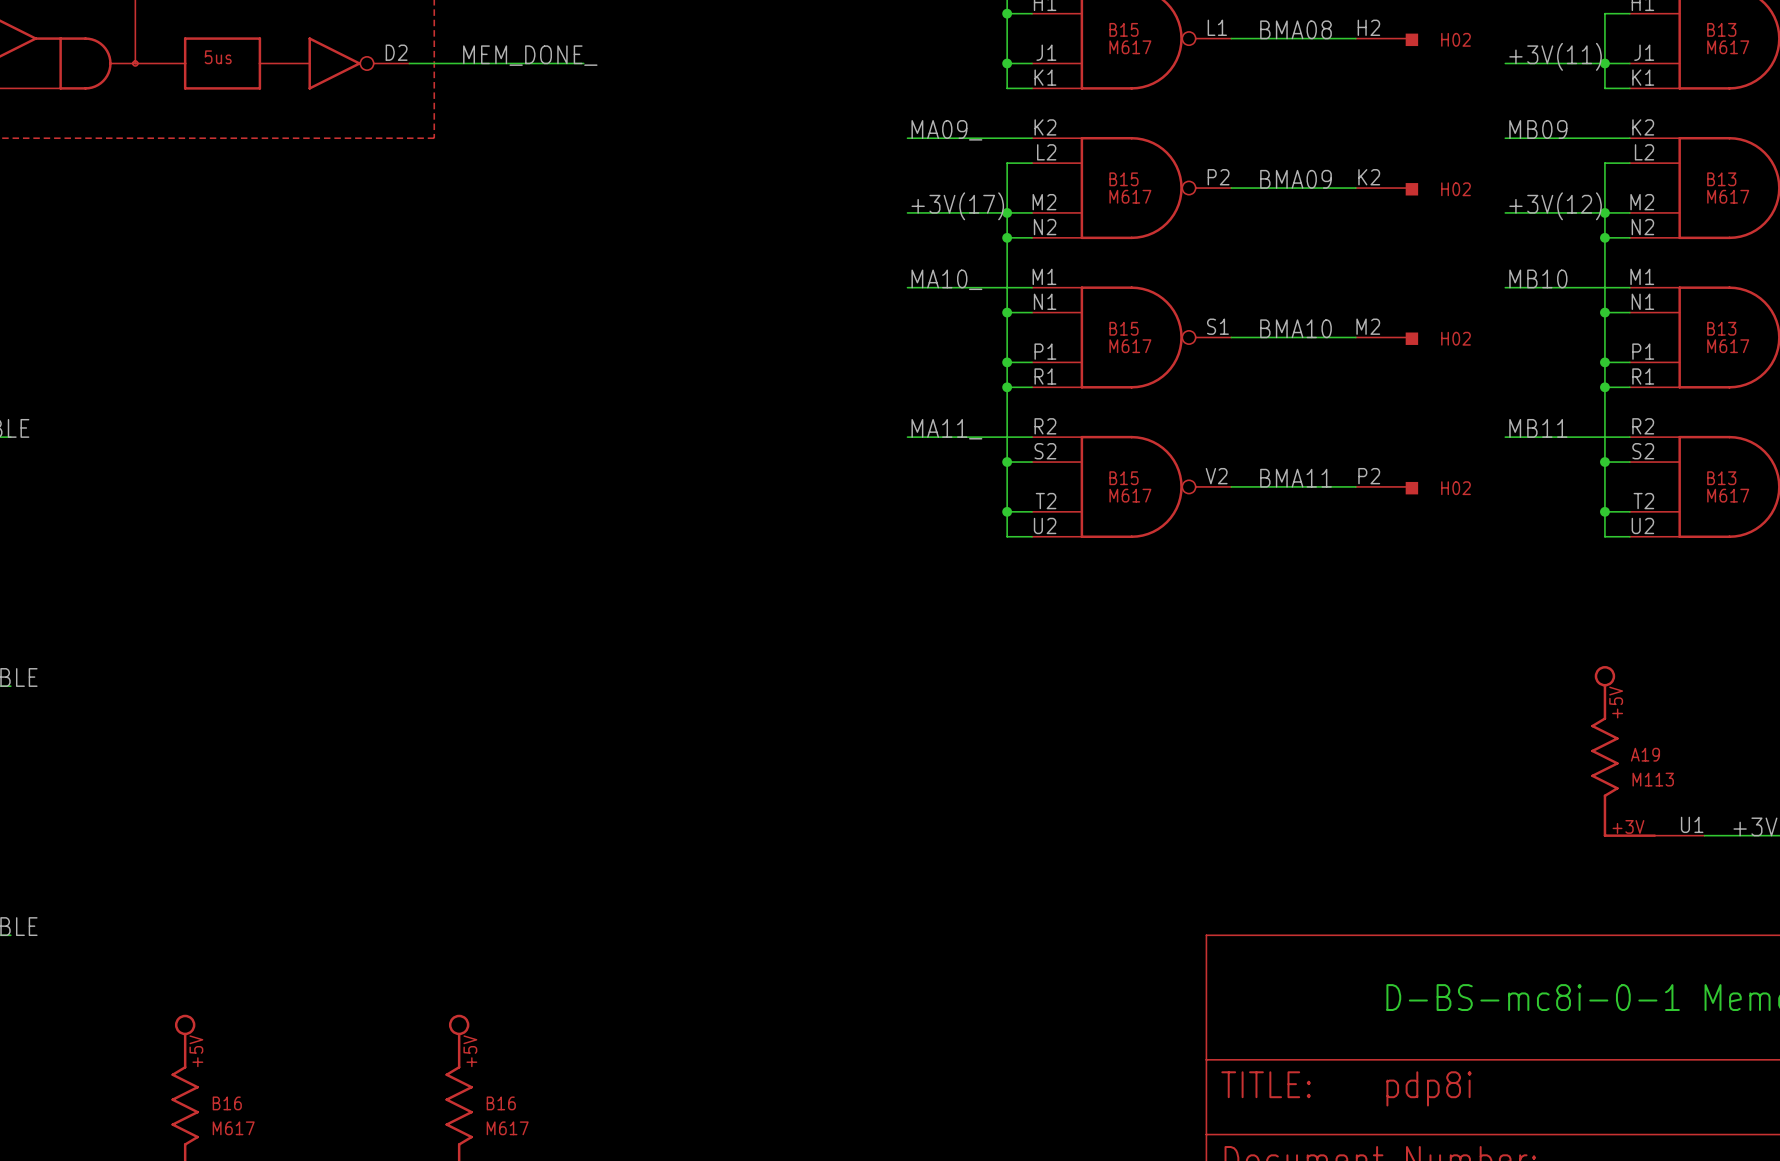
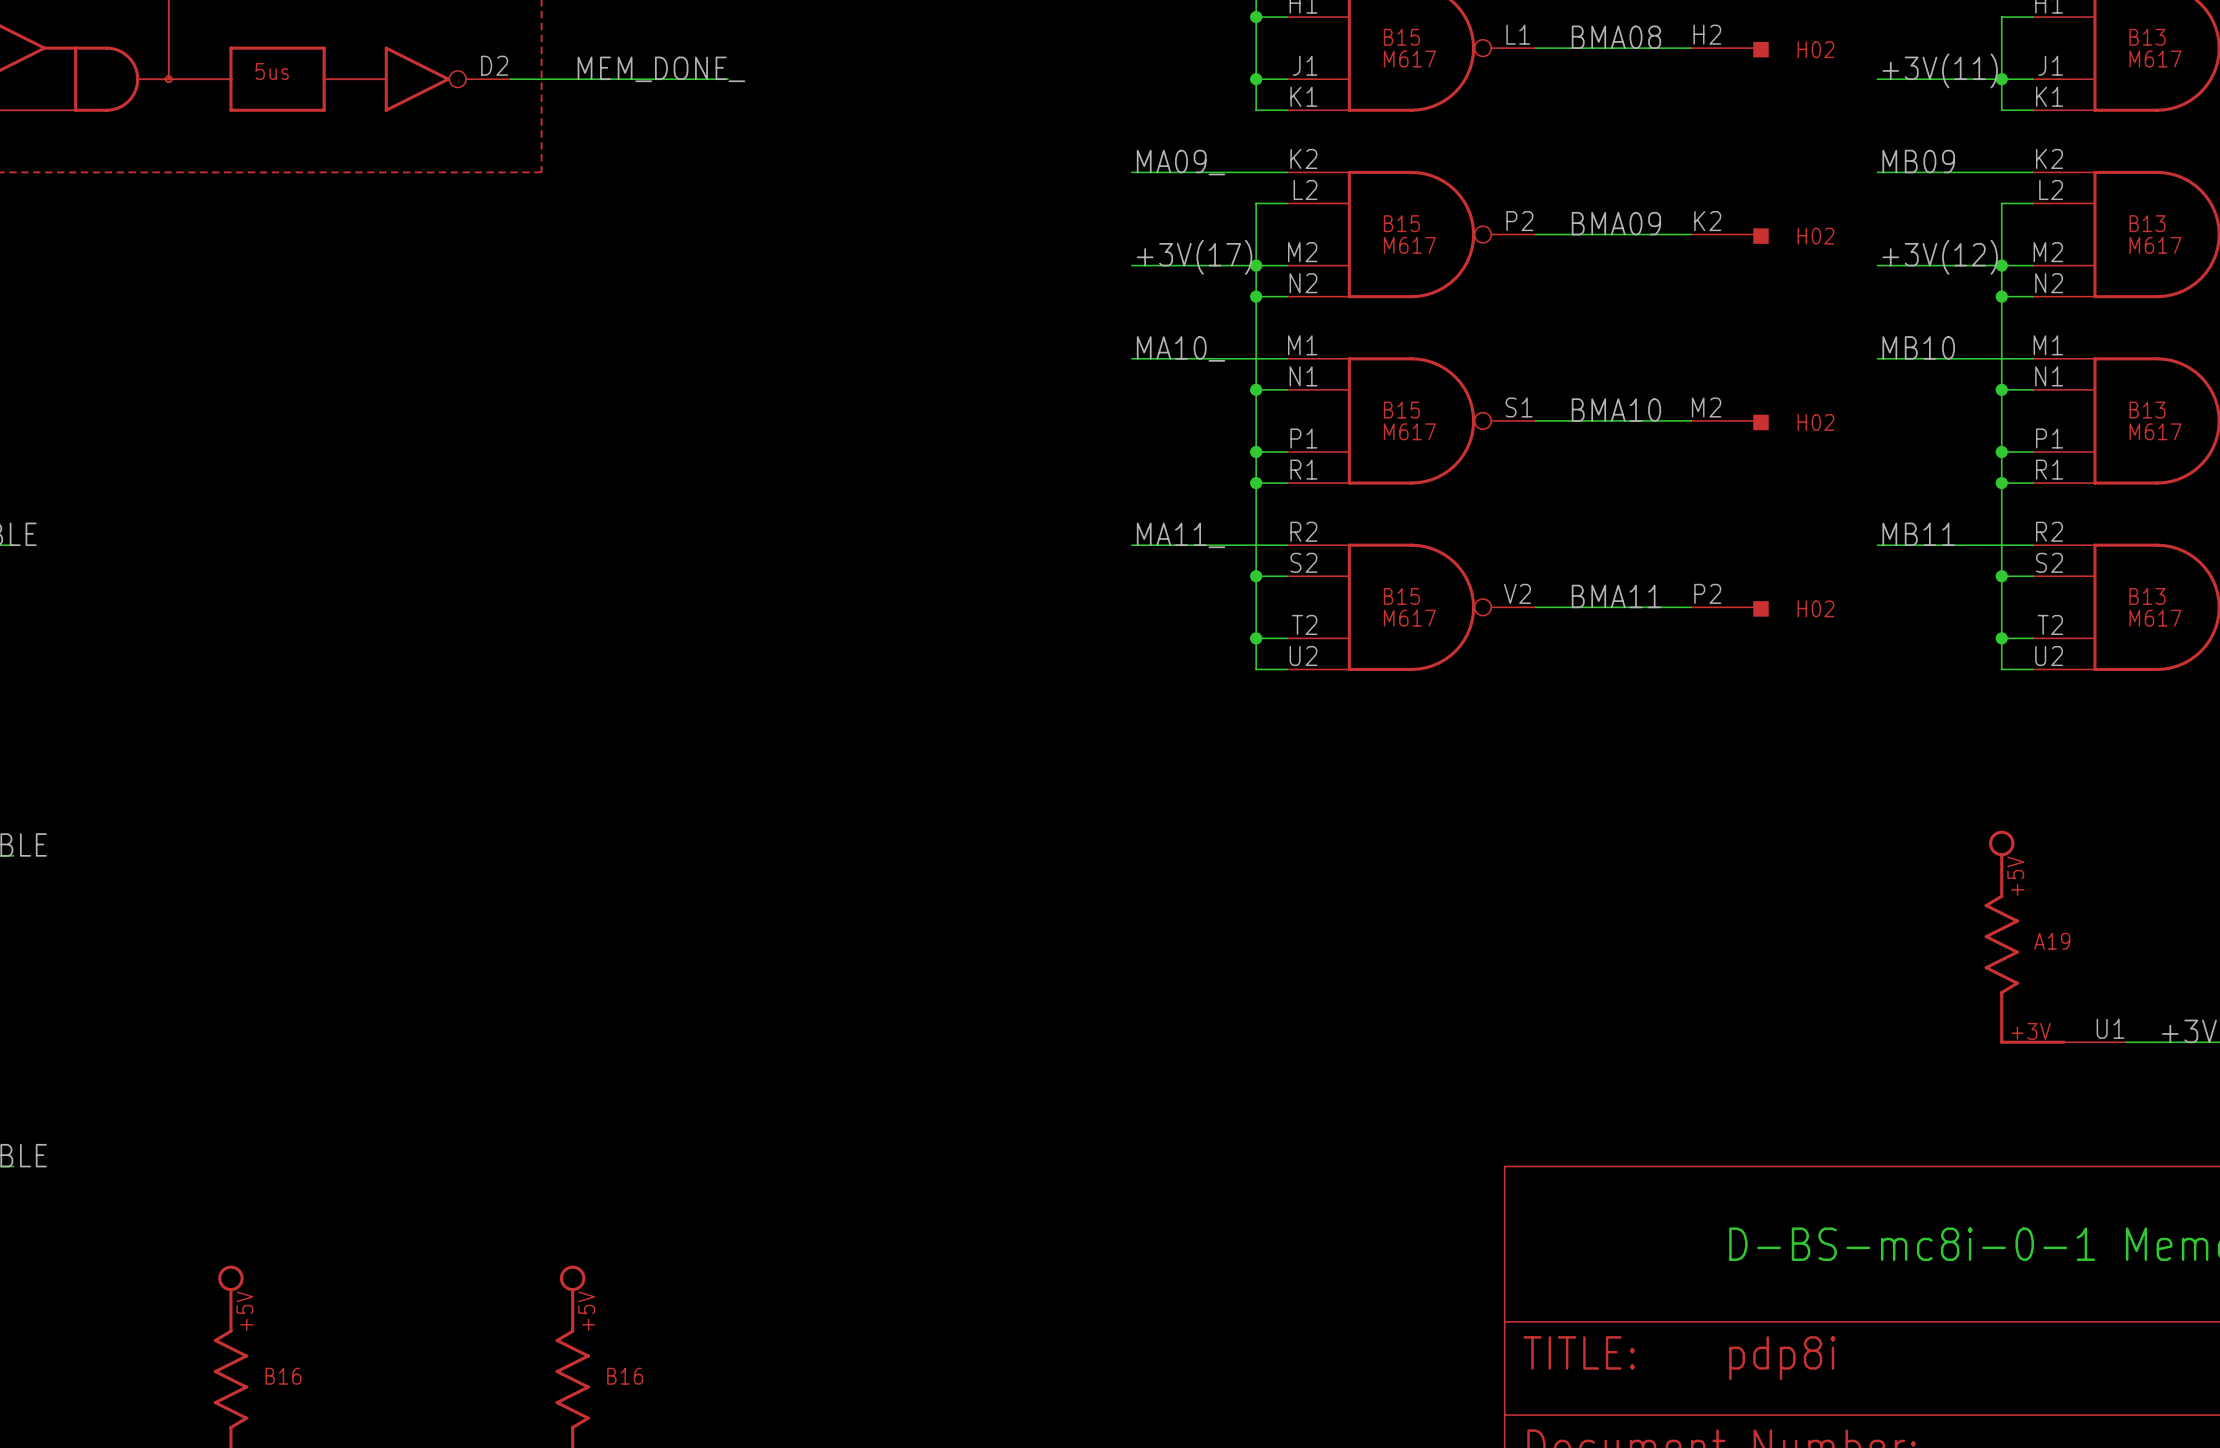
A19 value: M113 (1653, 779) -> none
B16 value: M617 (233, 1128) -> none
B16 value: M617 (507, 1128) -> none

